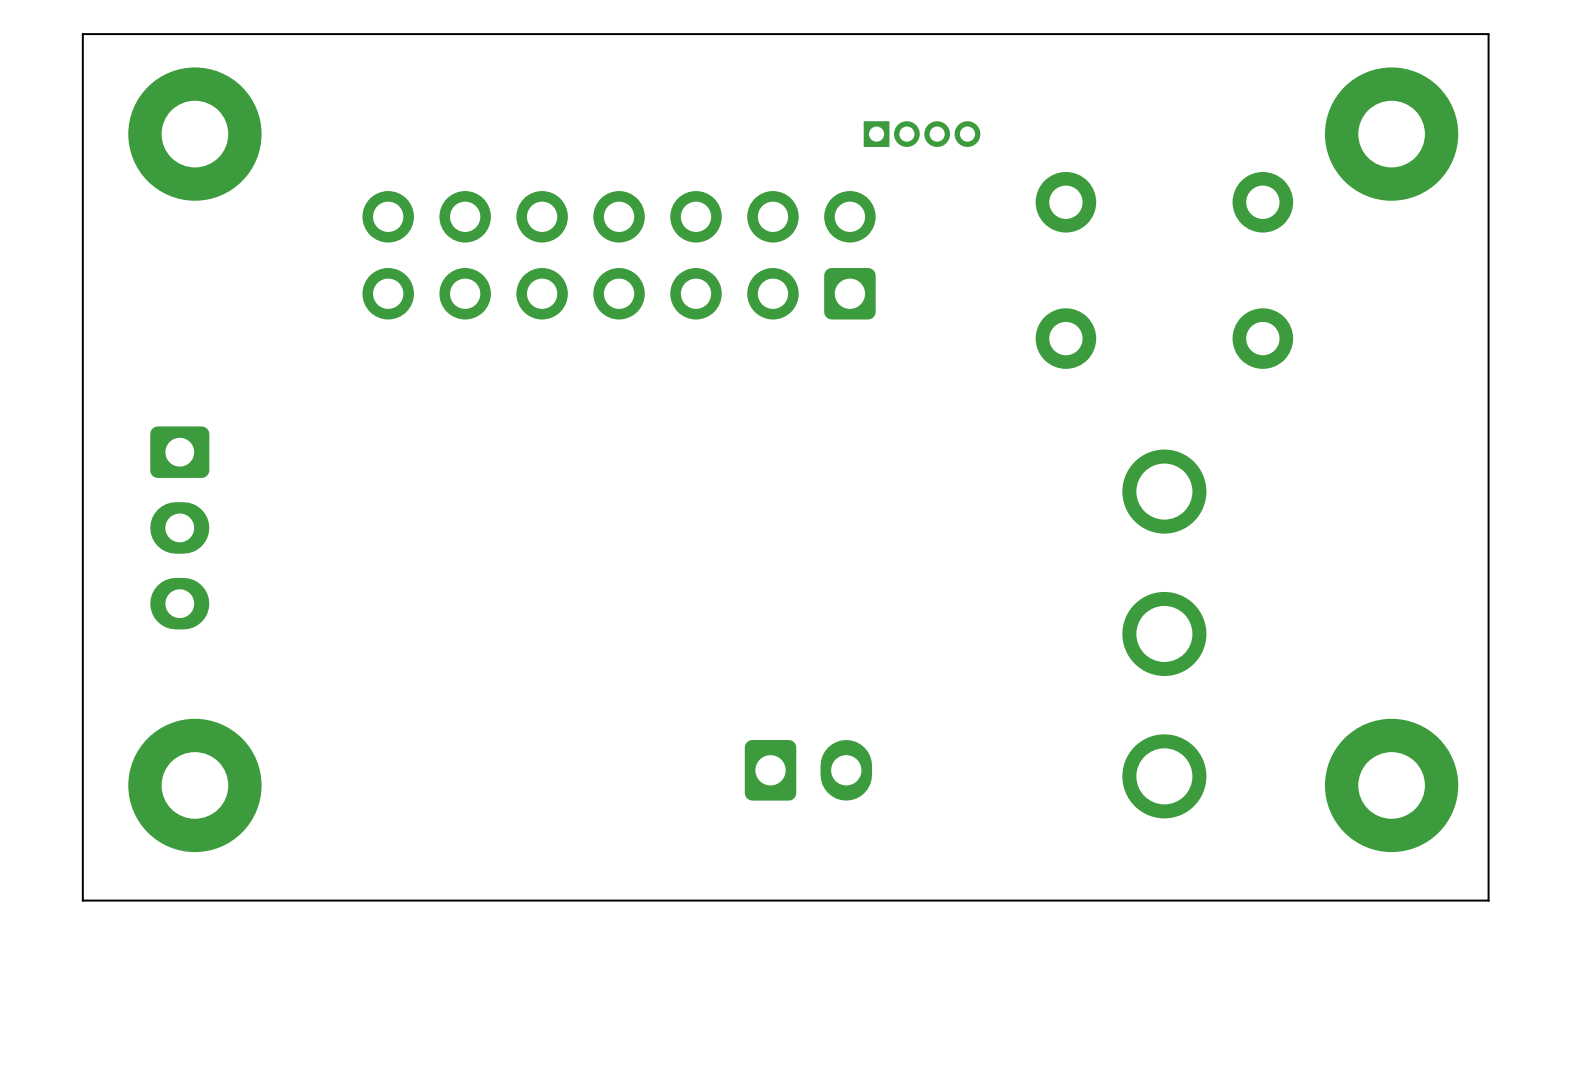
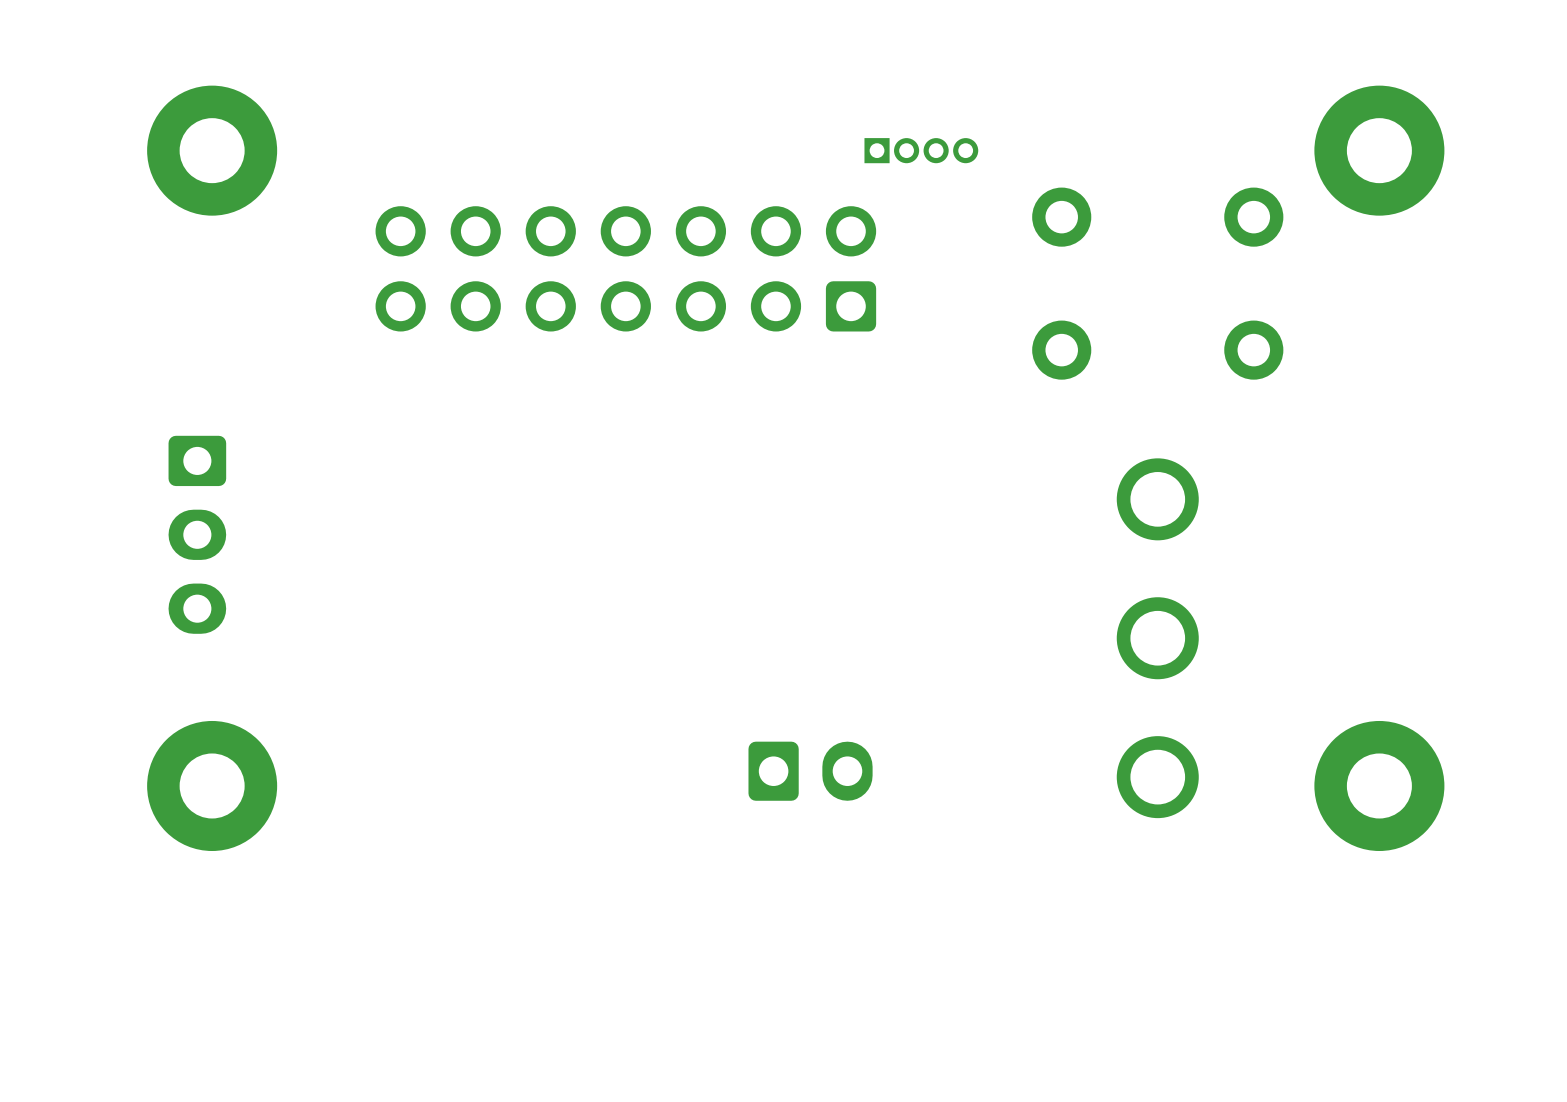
board edge: (1488, 34) (82, 34) (82, 900) (1488, 900) (1488, 34) -> none

